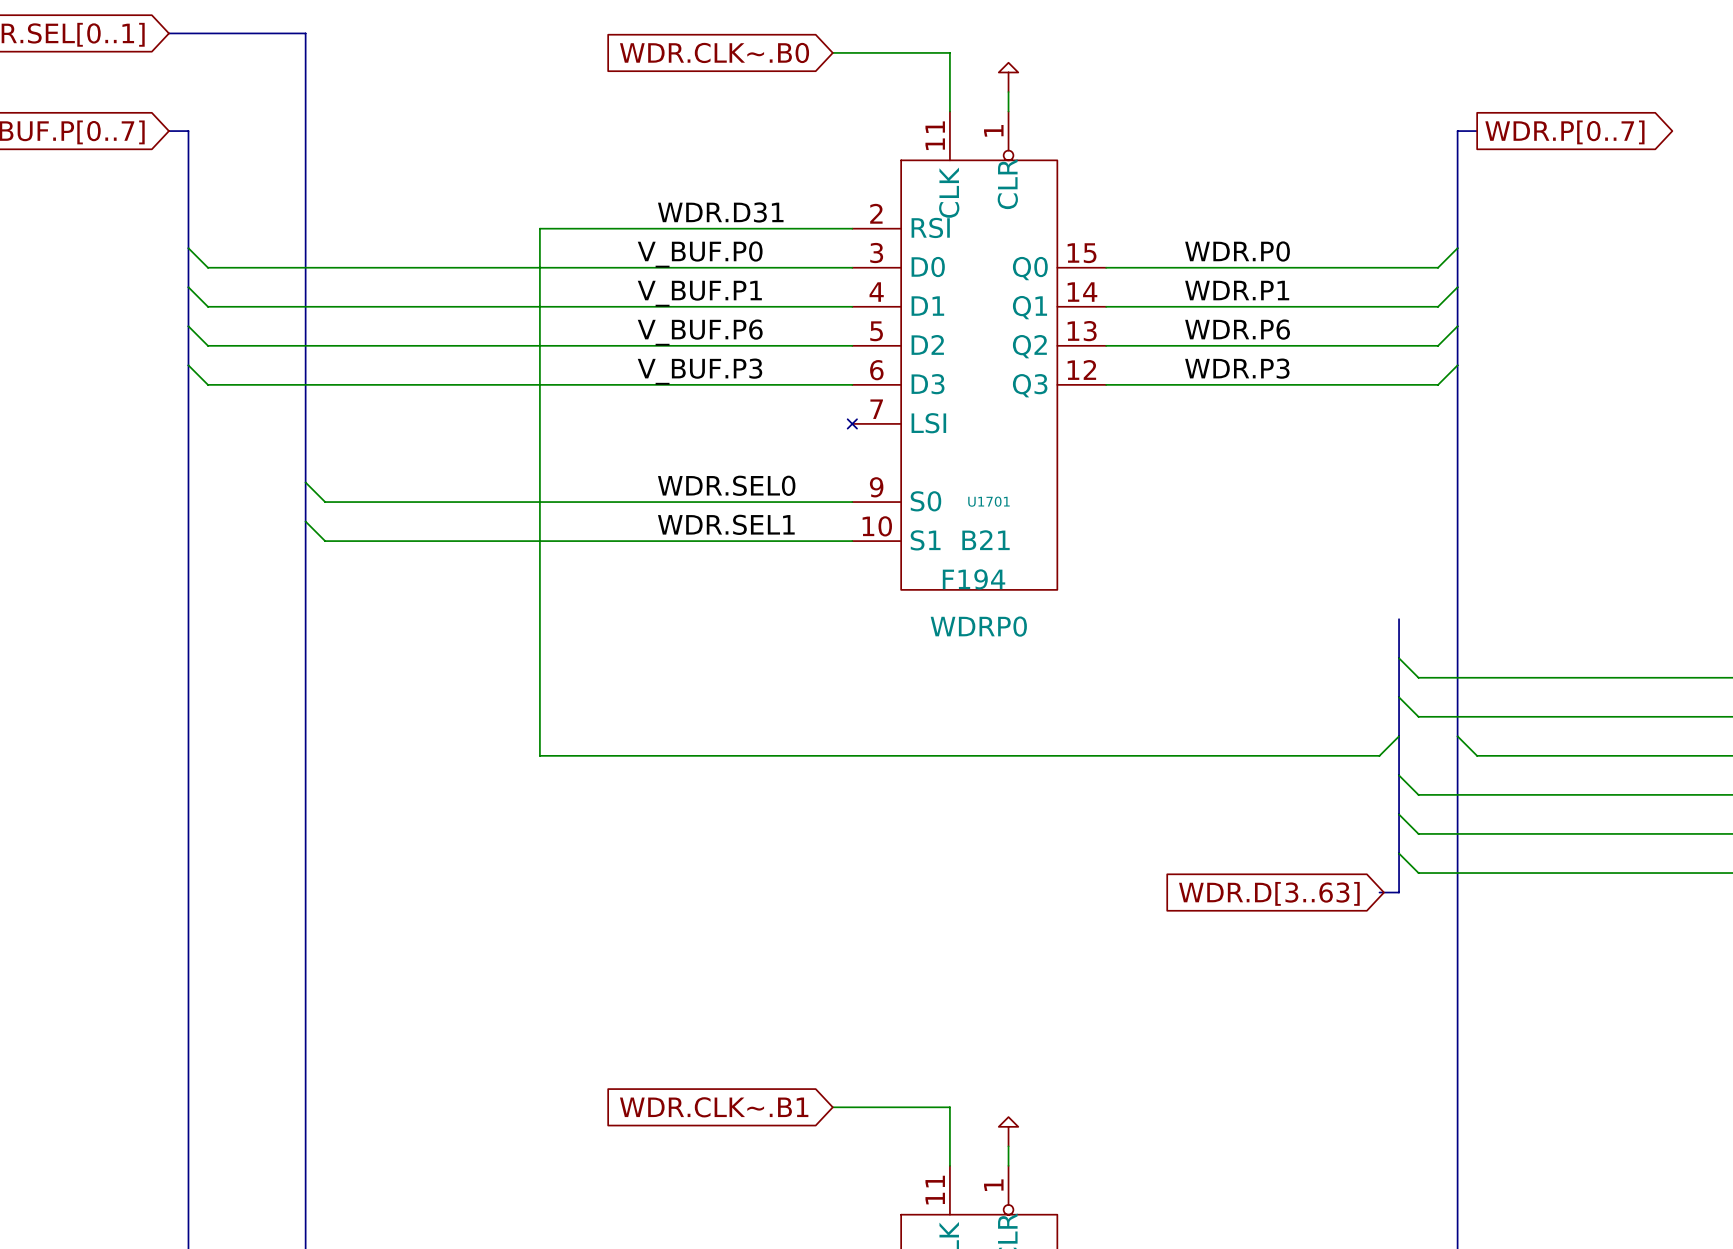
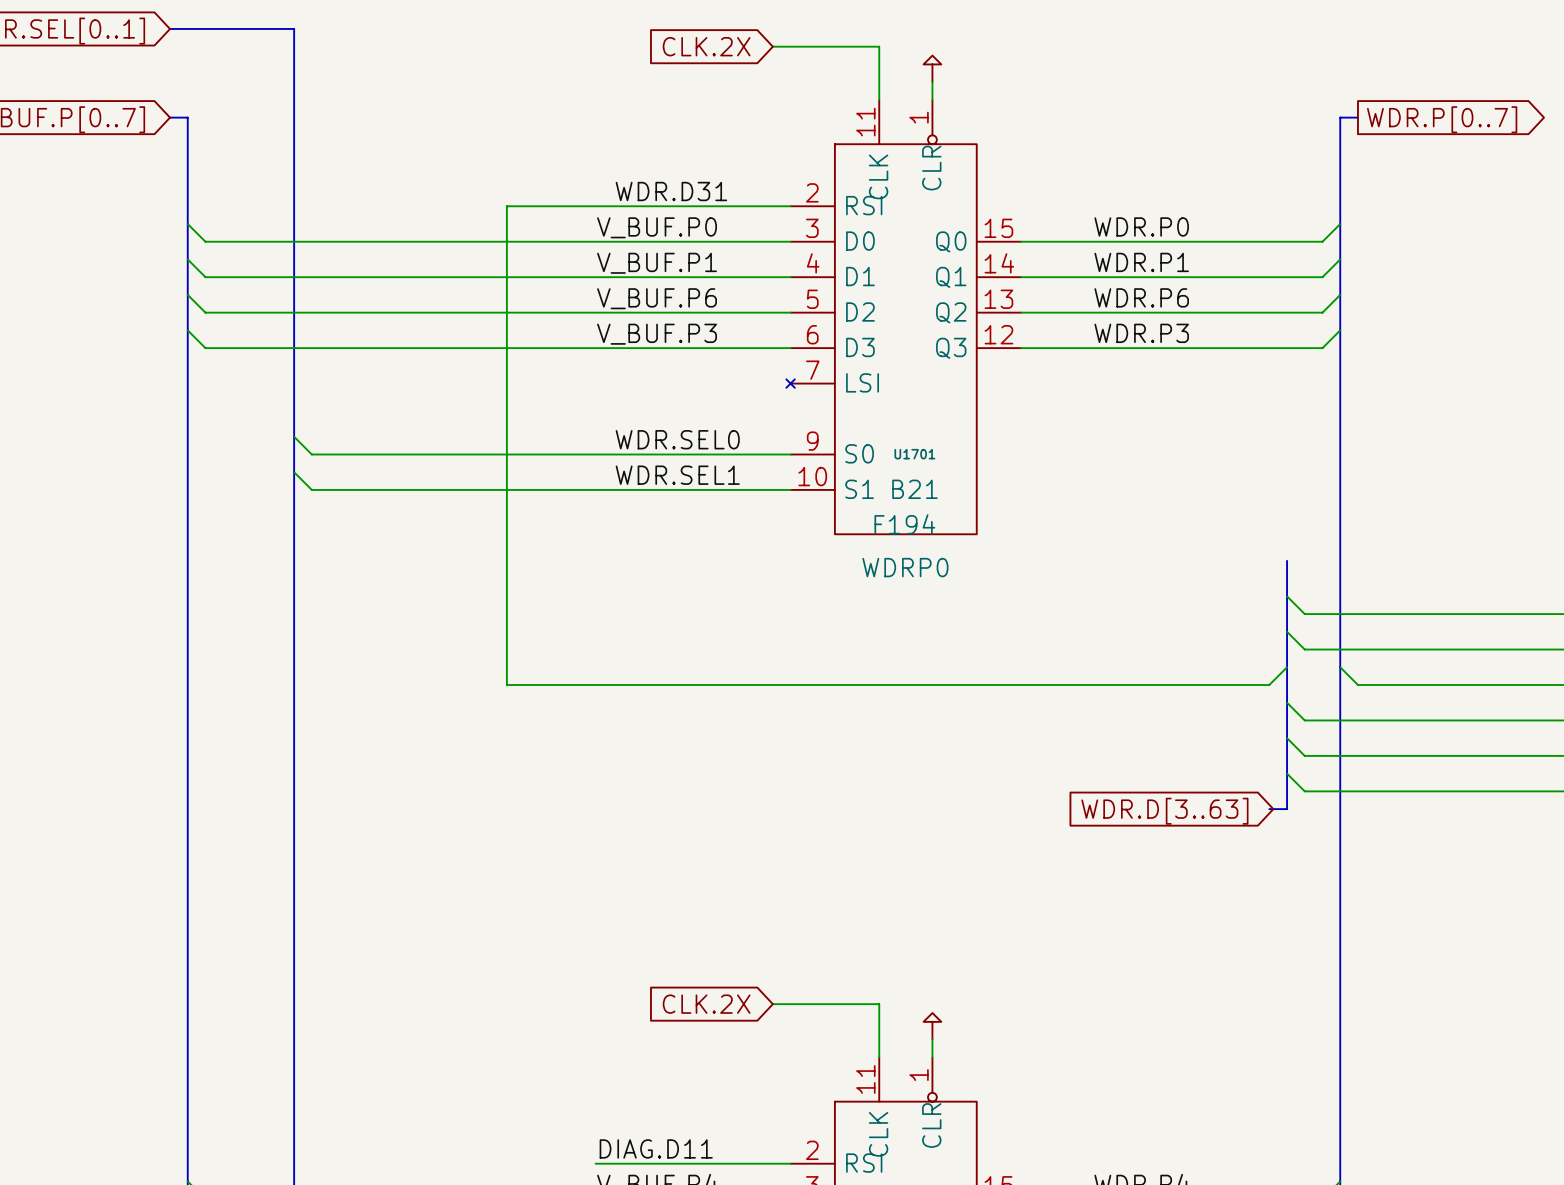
global label: WDR.CLK~.B0 (714, 52) -> CLK.2X (706, 46)
global label: WDR.CLK~.B1 (714, 1107) -> CLK.2X (706, 1004)

